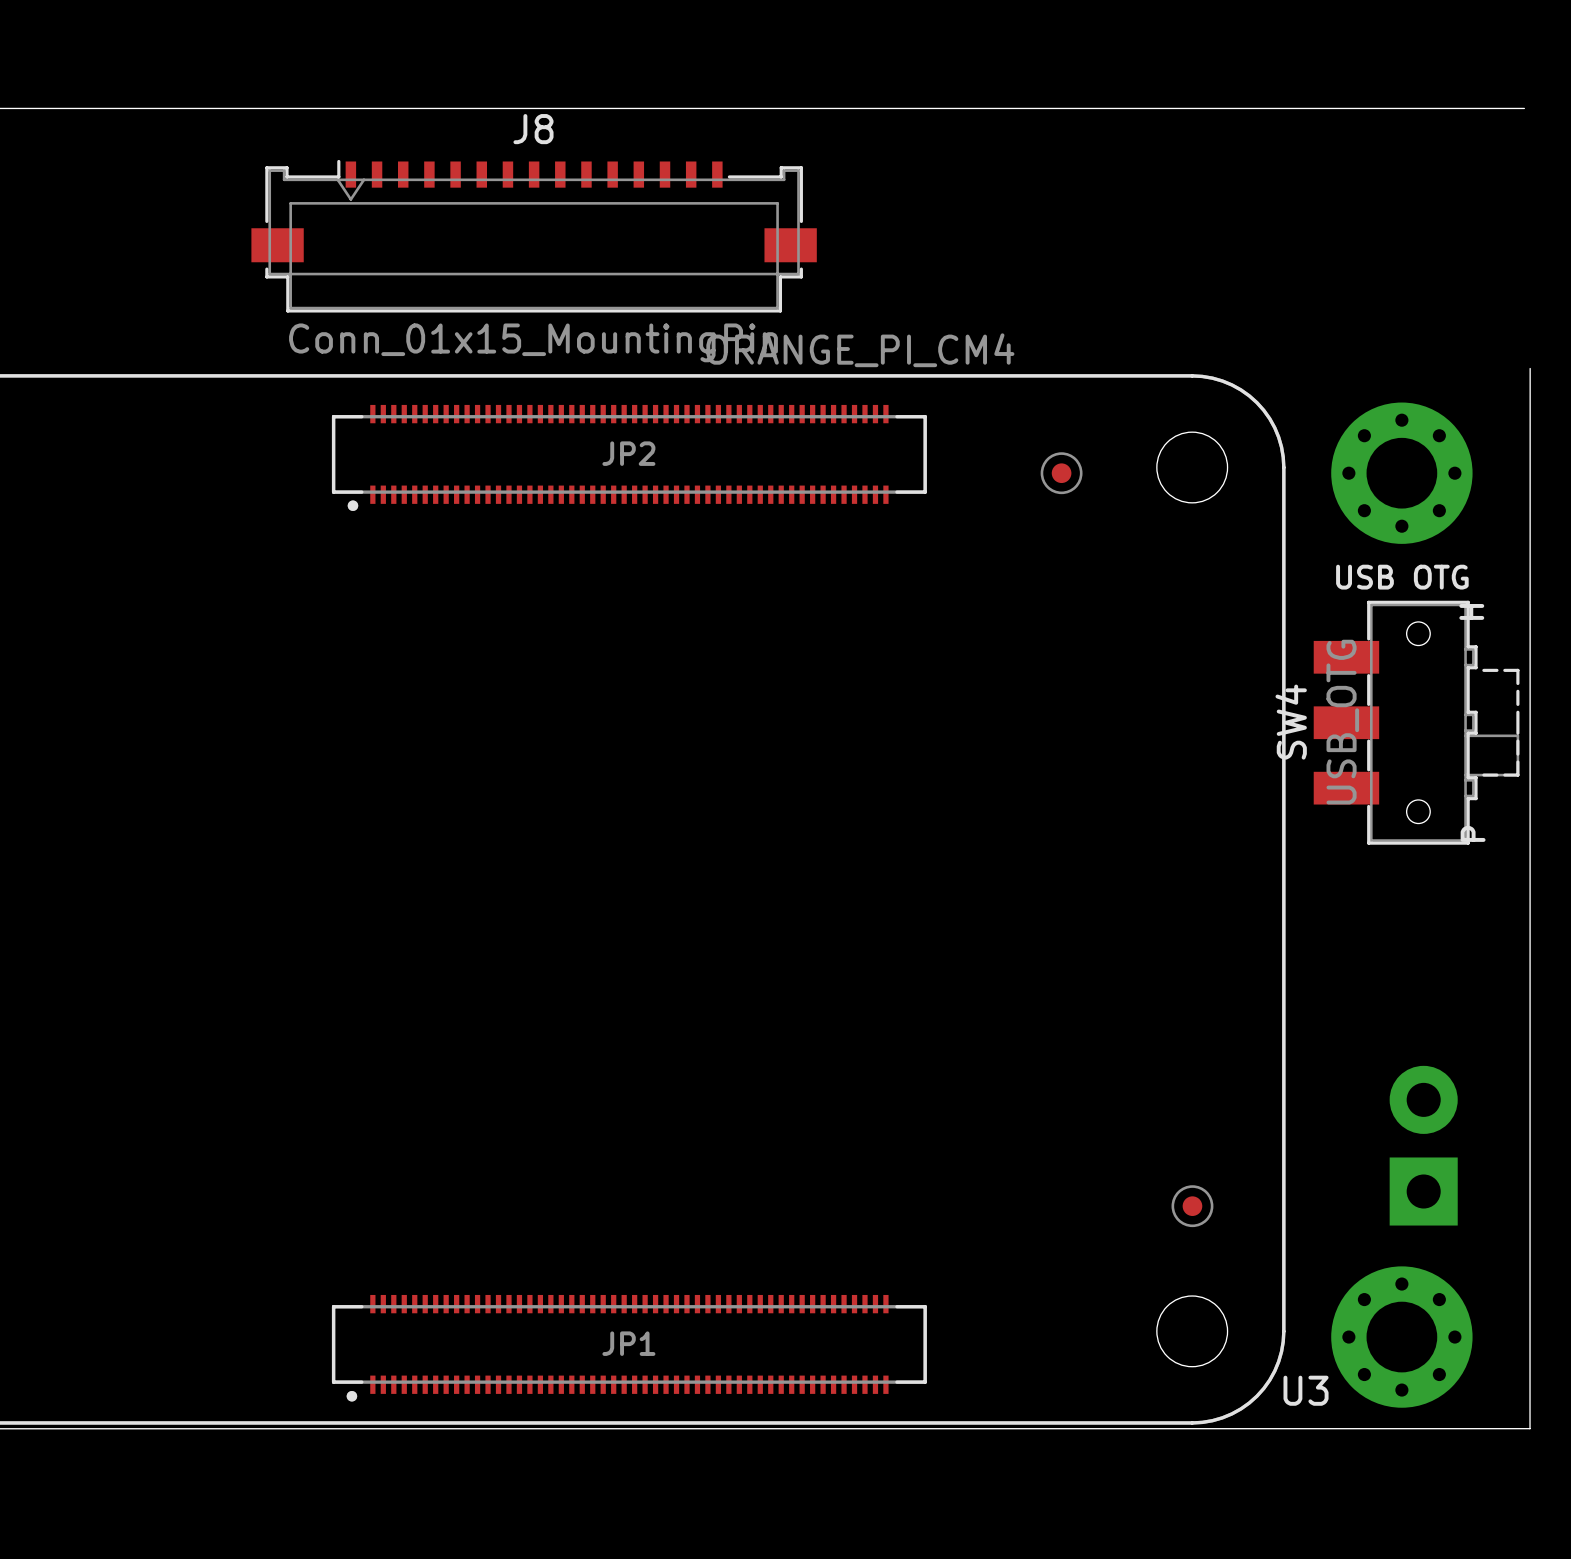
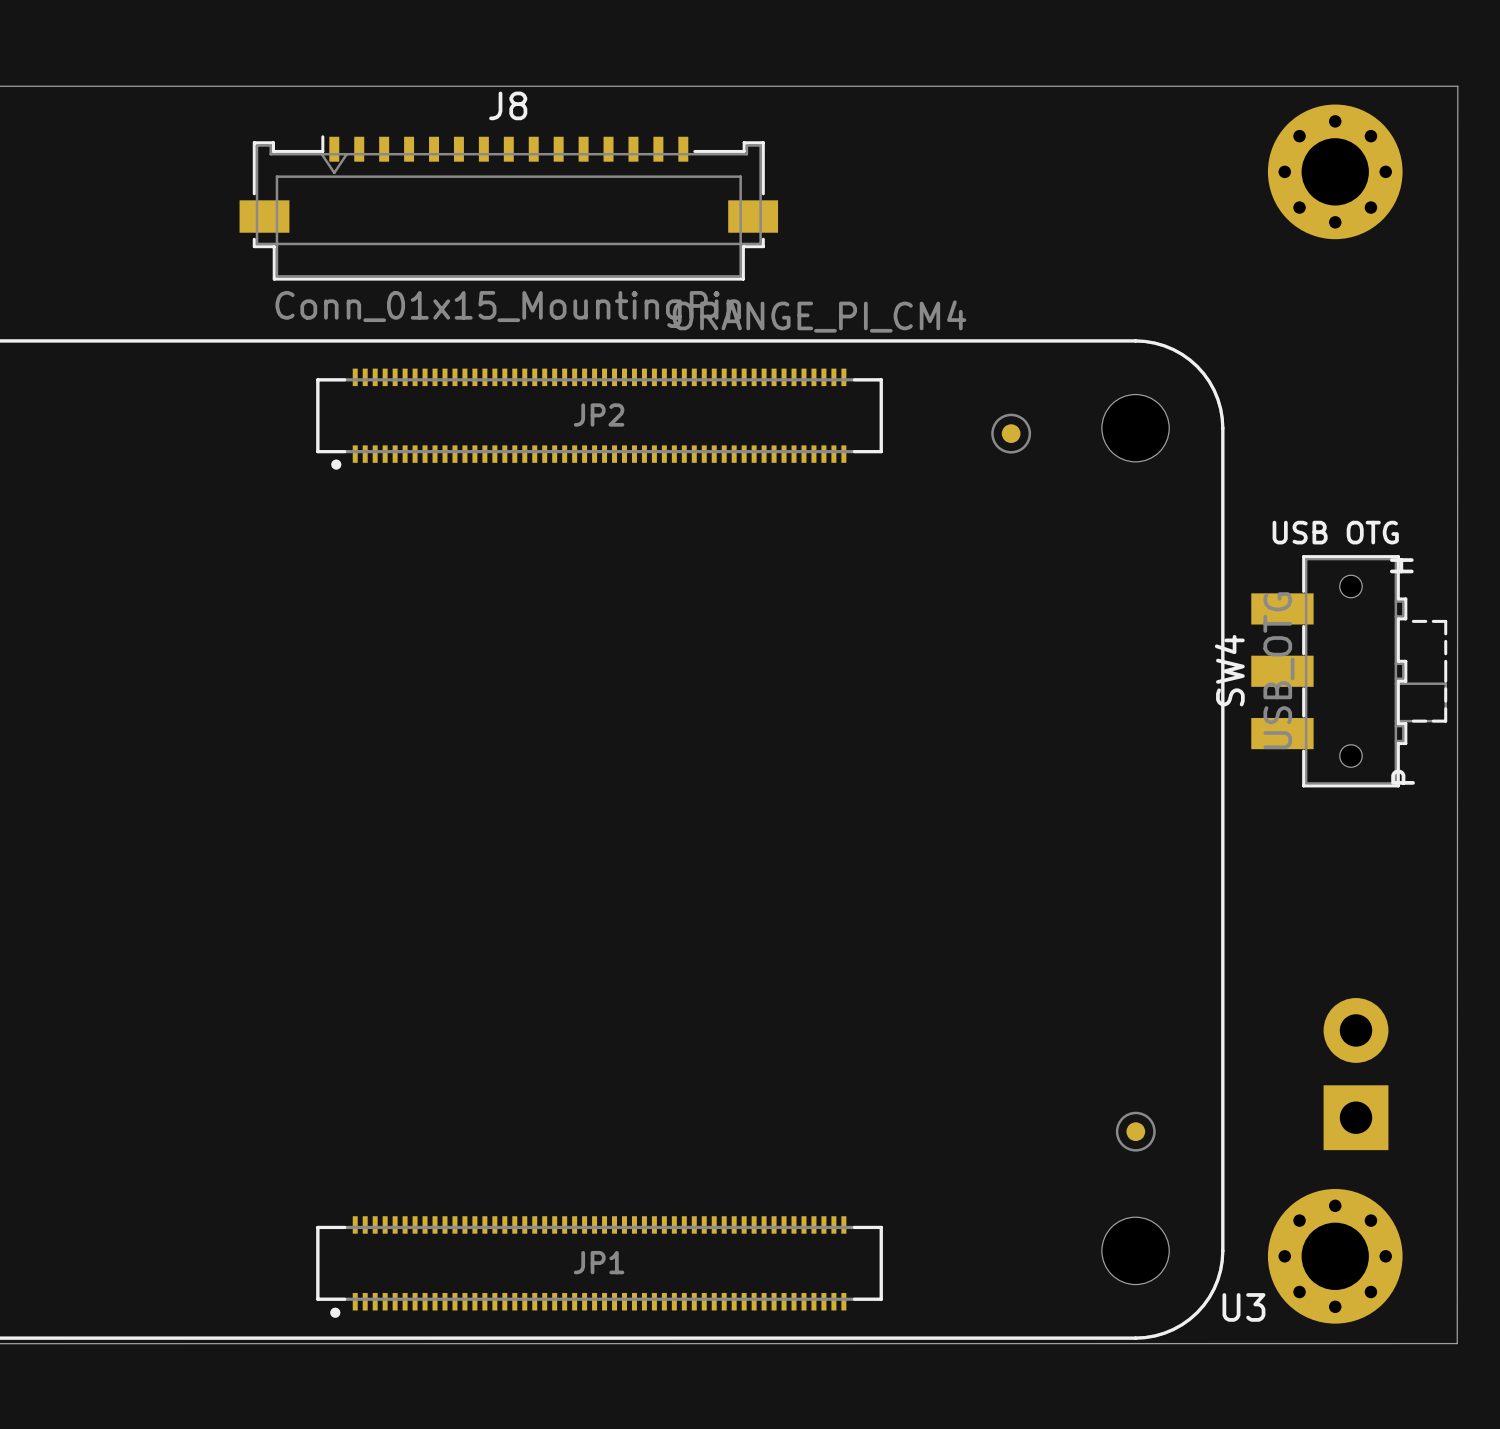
board edge: (1530, 368) (1530, 1428) -> (1451, 86) (1457, 86) (1457, 1343)
part position: (1401, 473) -> (1335, 171)

